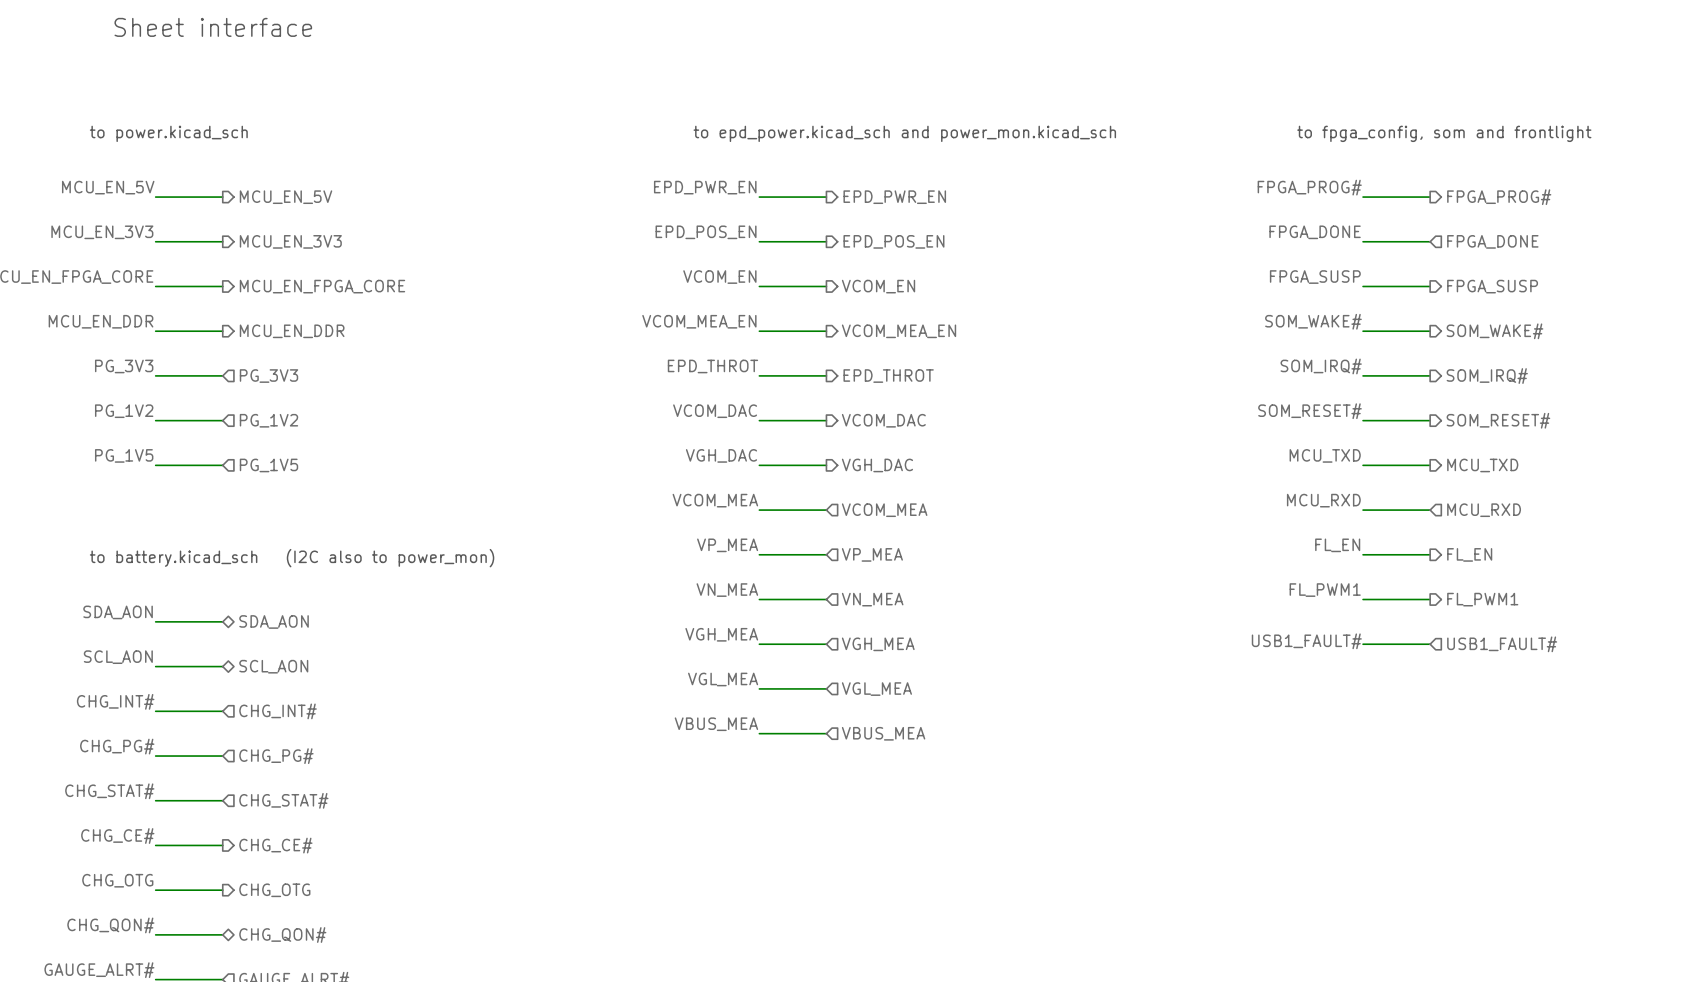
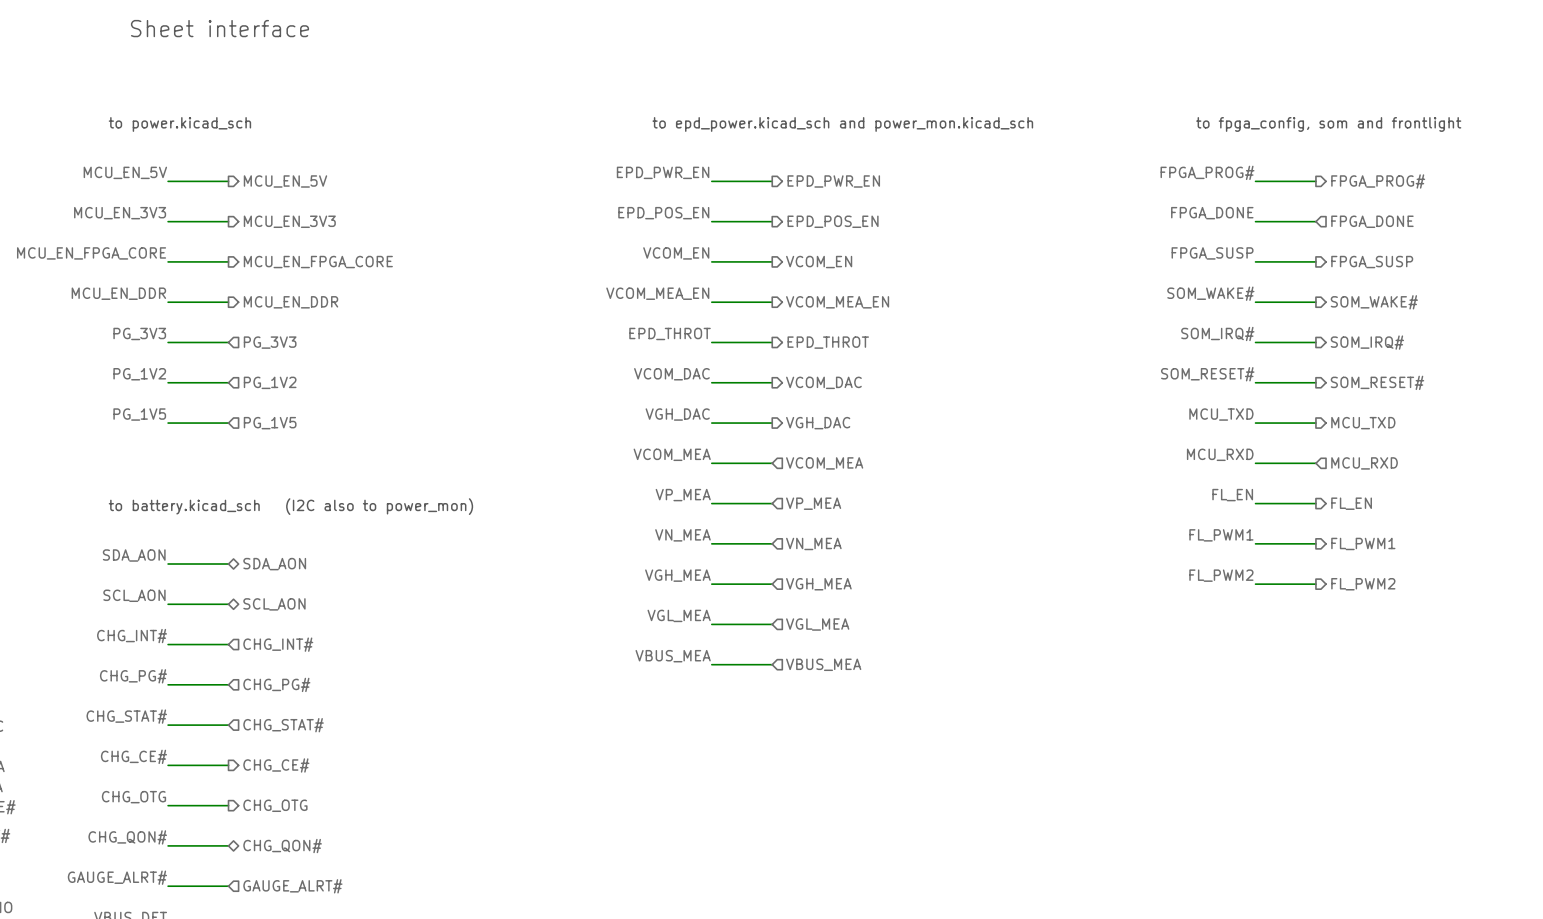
label: USB1_FAULT# (1306, 641) -> FL_PWM2 (1221, 575)
hierarchical label shape: input (1502, 644) -> output (1363, 584)
hierarchical label: USB1_FAULT# (1502, 644) -> FL_PWM2 (1363, 584)

